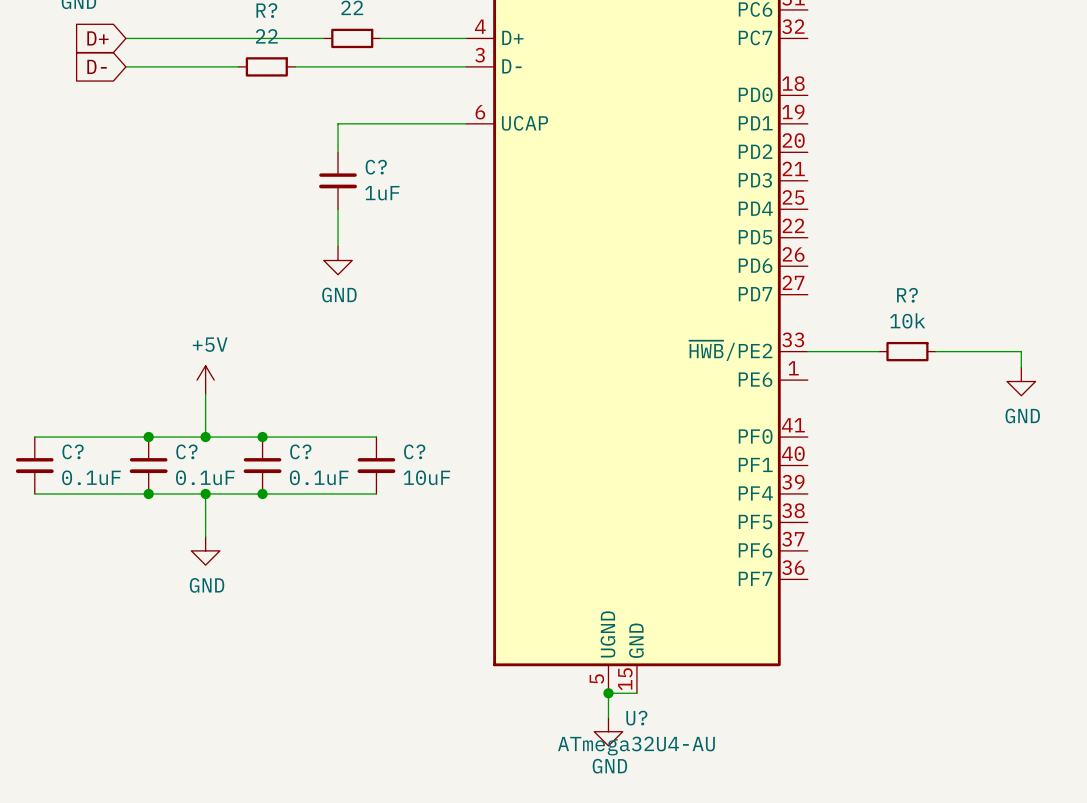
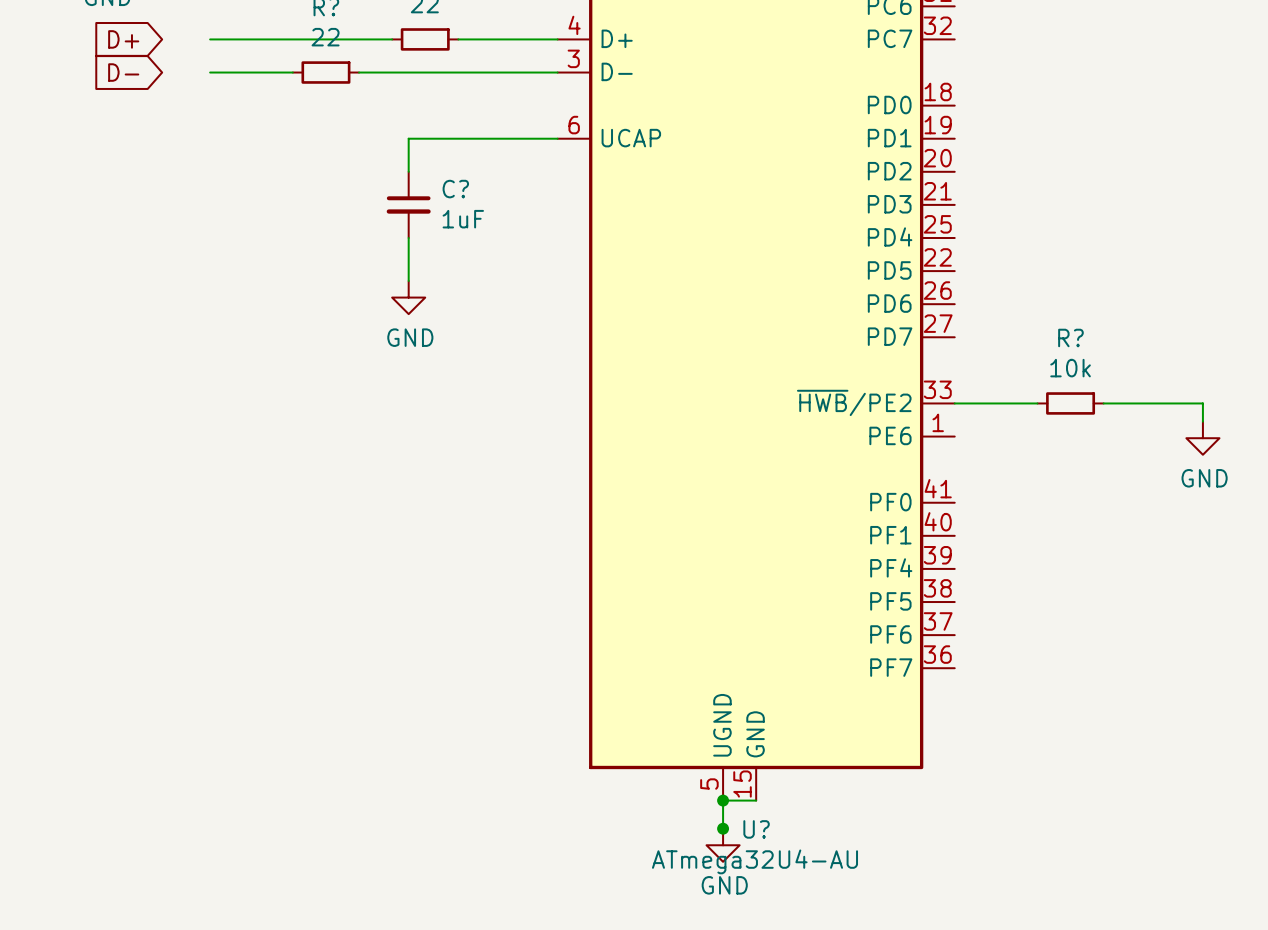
wire: (125, 38) (167, 38) -> none
wire: (125, 66) (167, 66) -> none
power symbol: +5V (205, 380) -> none
wire: (205, 394) (205, 437) -> none
wire: (34, 437) (376, 437) -> none
junction: (148, 437) -> none
junction: (205, 437) -> none
junction: (262, 437) -> none
C?: 0.1uF (34, 465) -> none
C?: 0.1uF (148, 465) -> none
C?: 0.1uF (262, 465) -> none
C?: 10uF (376, 465) -> none
wire: (34, 493) (376, 493) -> none
junction: (148, 493) -> none
wire: (205, 493) (205, 536) -> none
junction: (205, 493) -> none
junction: (262, 493) -> none
power symbol: GND (205, 550) -> none
junction: none -> (723, 828)

